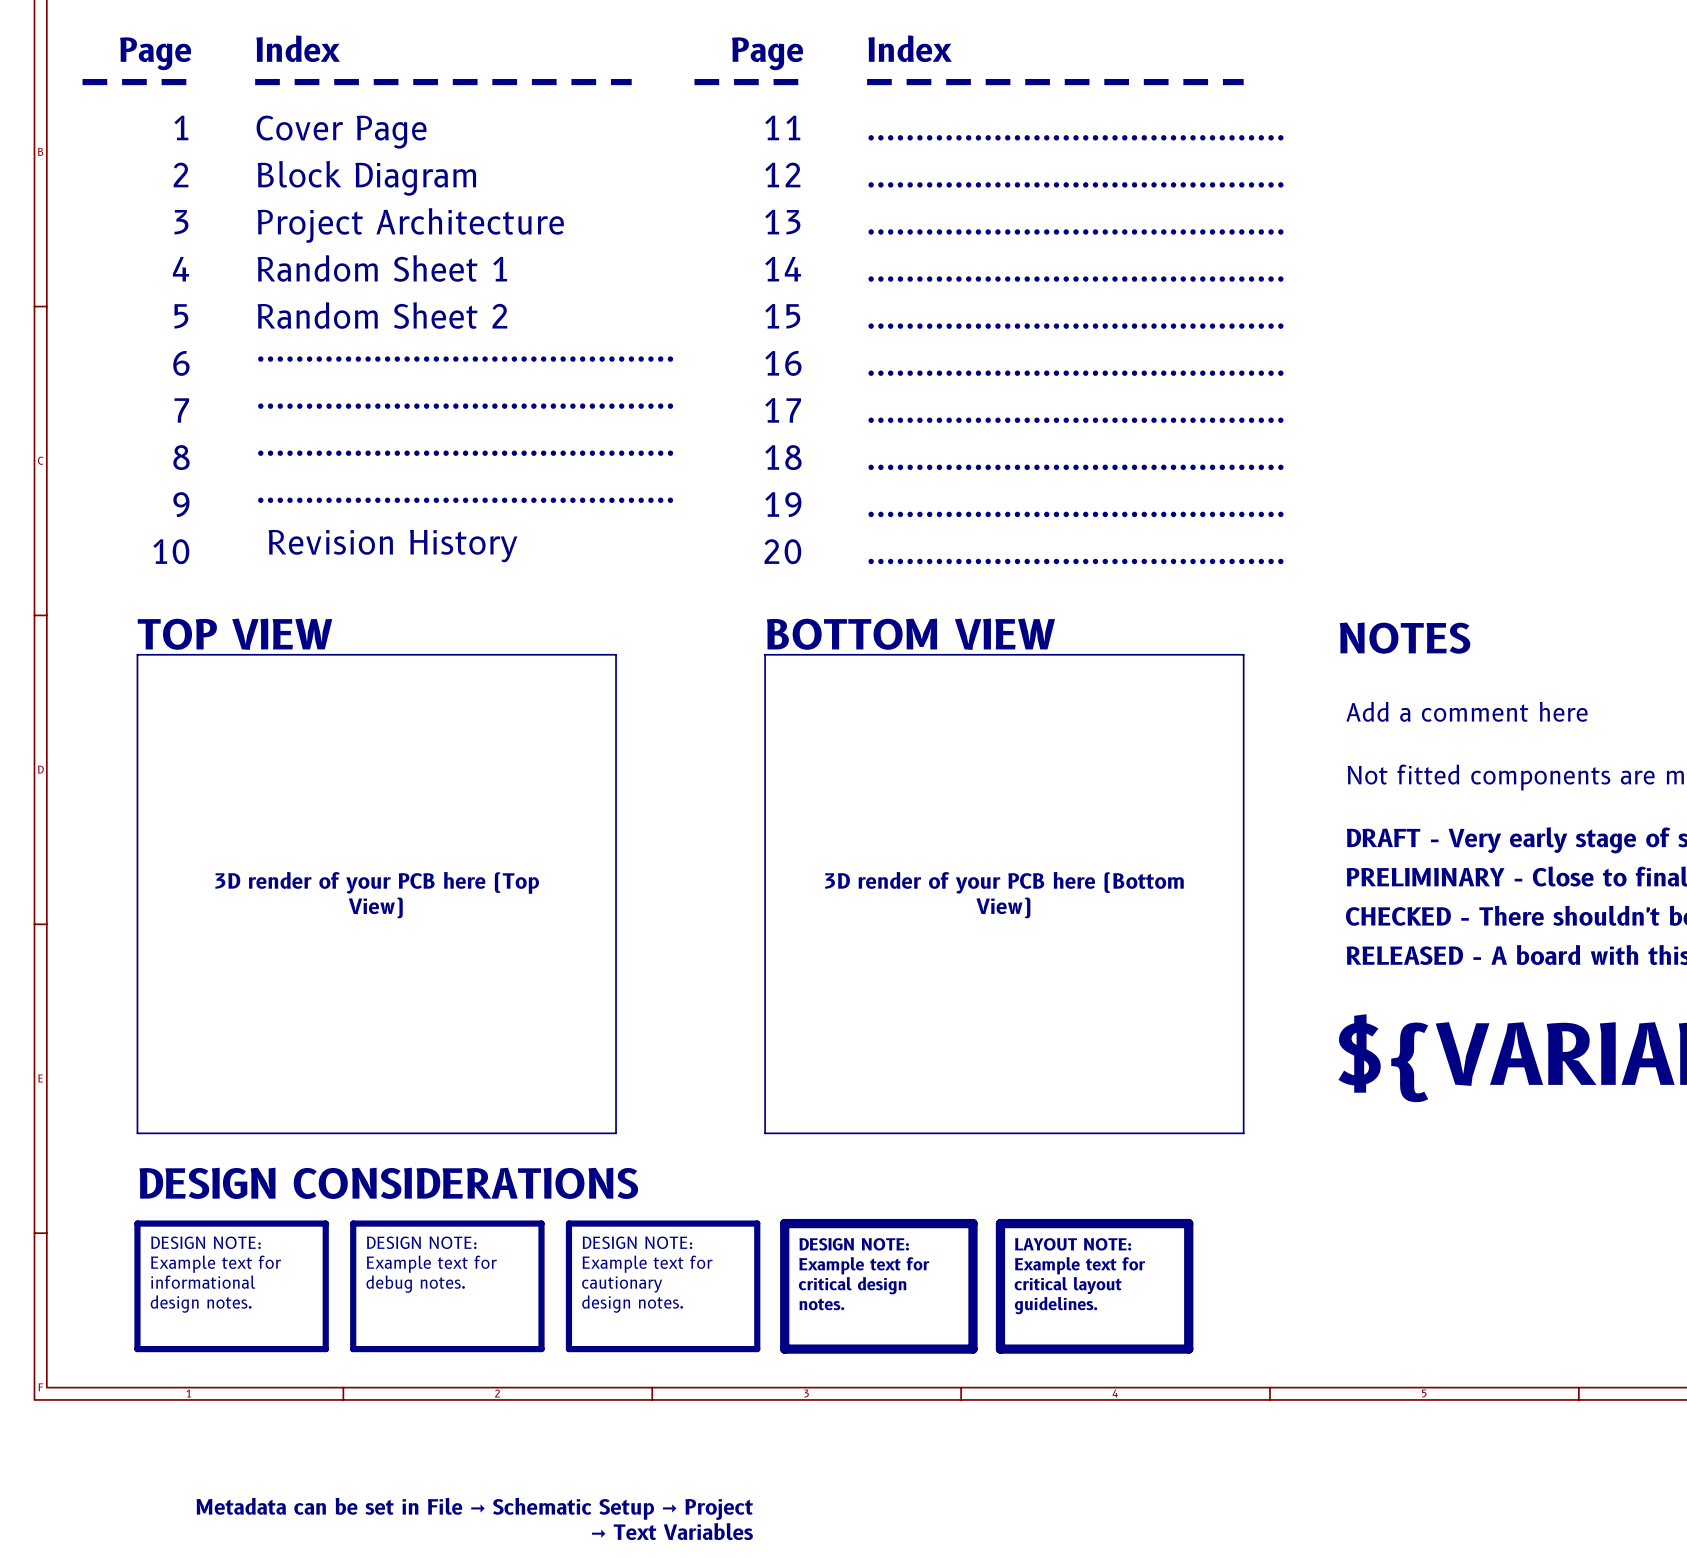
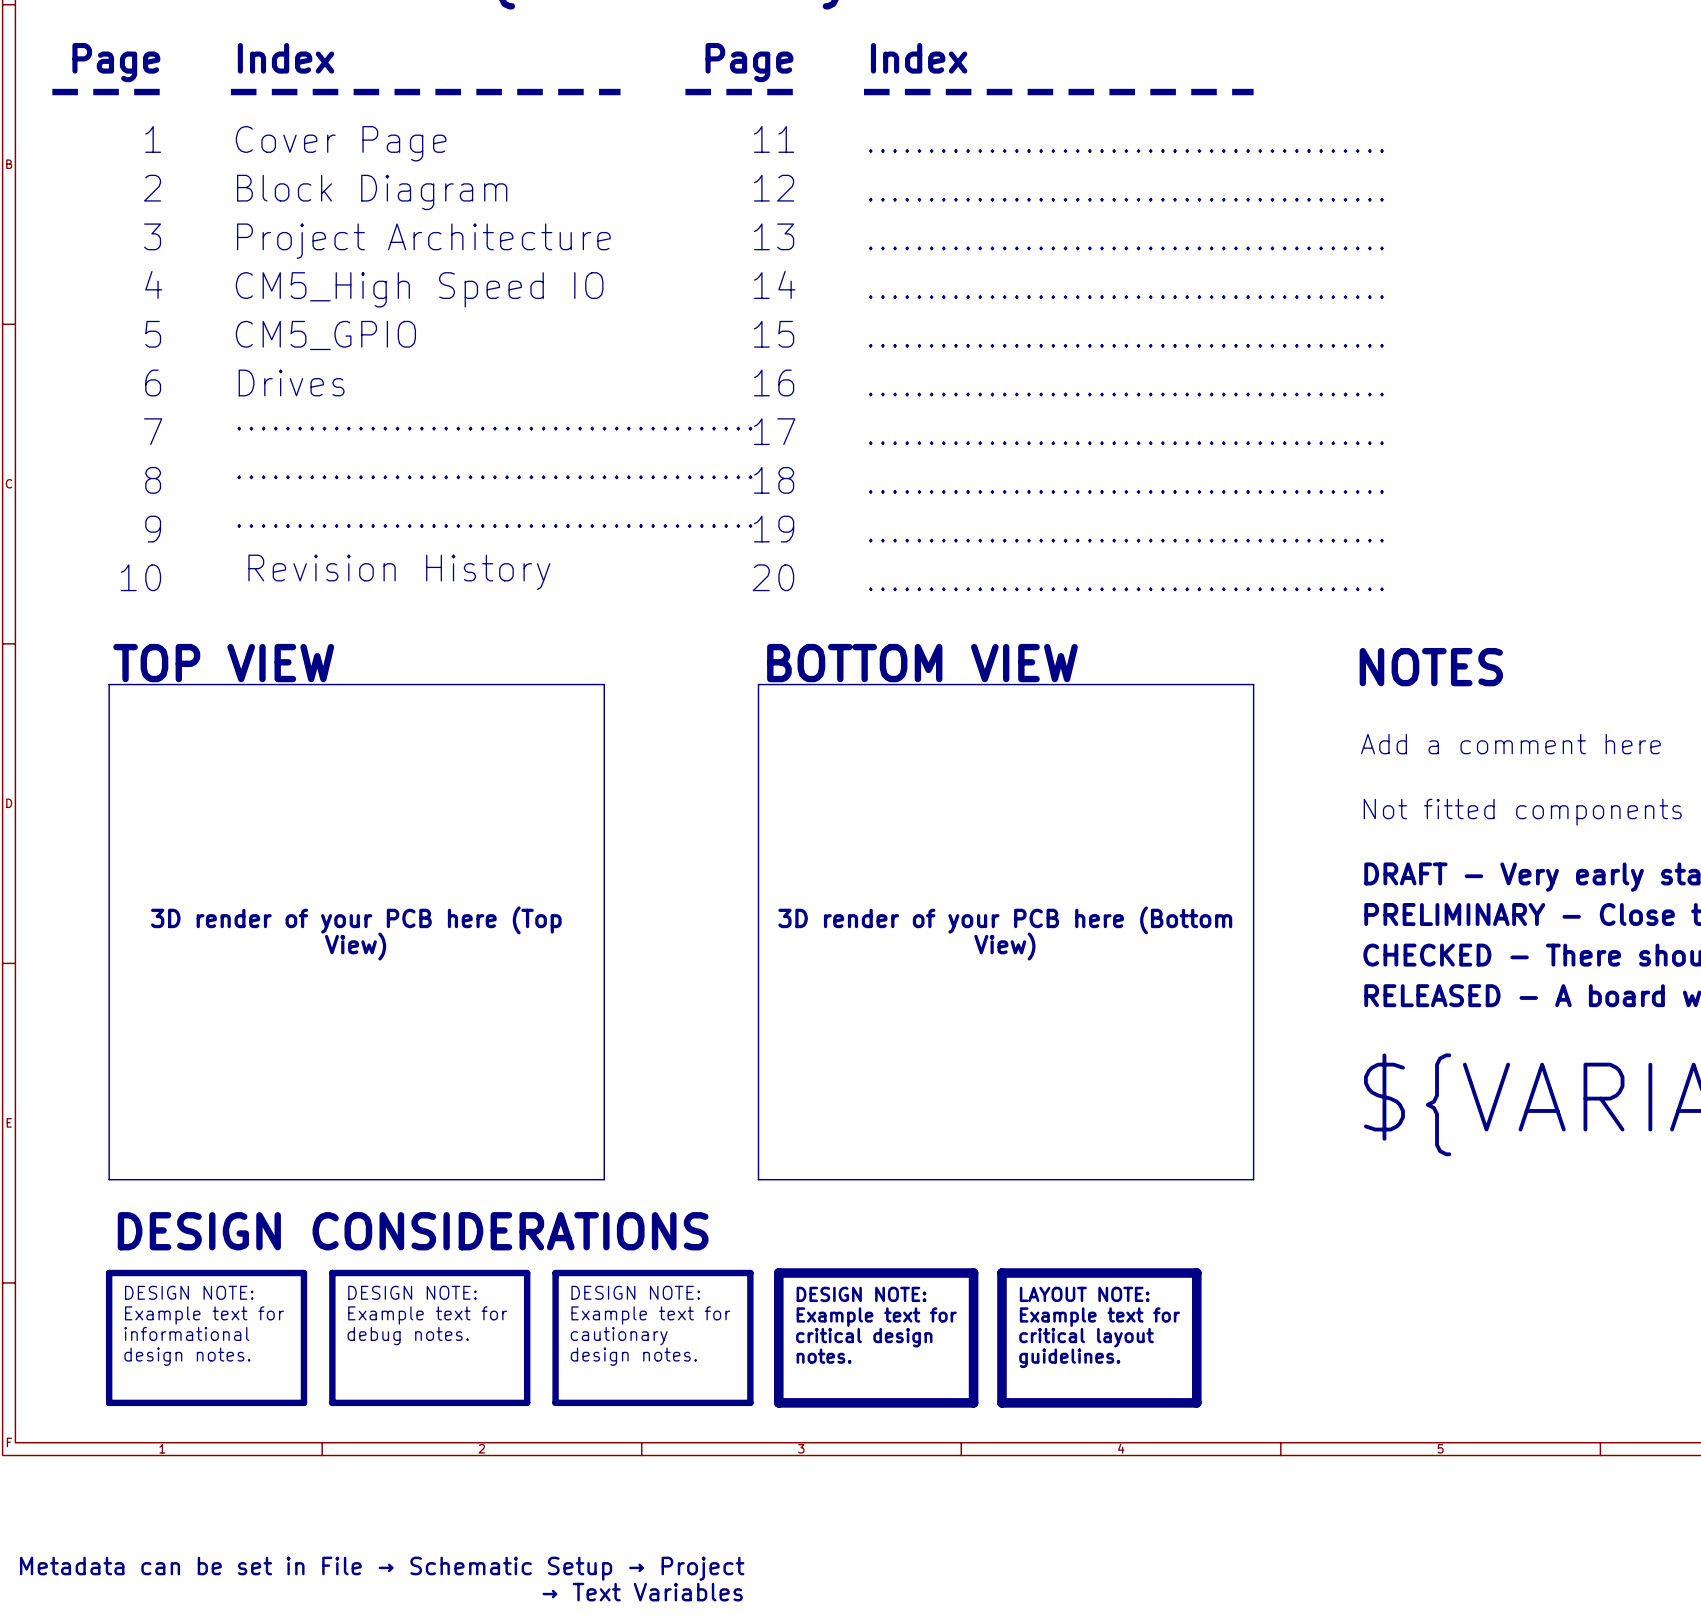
text: Random Sheet 1 (382, 268) -> CM5_High Speed IO (419, 289)
text: Random Sheet 2 (382, 315) -> CM5_GPIO (325, 335)
text: ........................................... (465, 359) -> none
text: none -> Drives (291, 382)

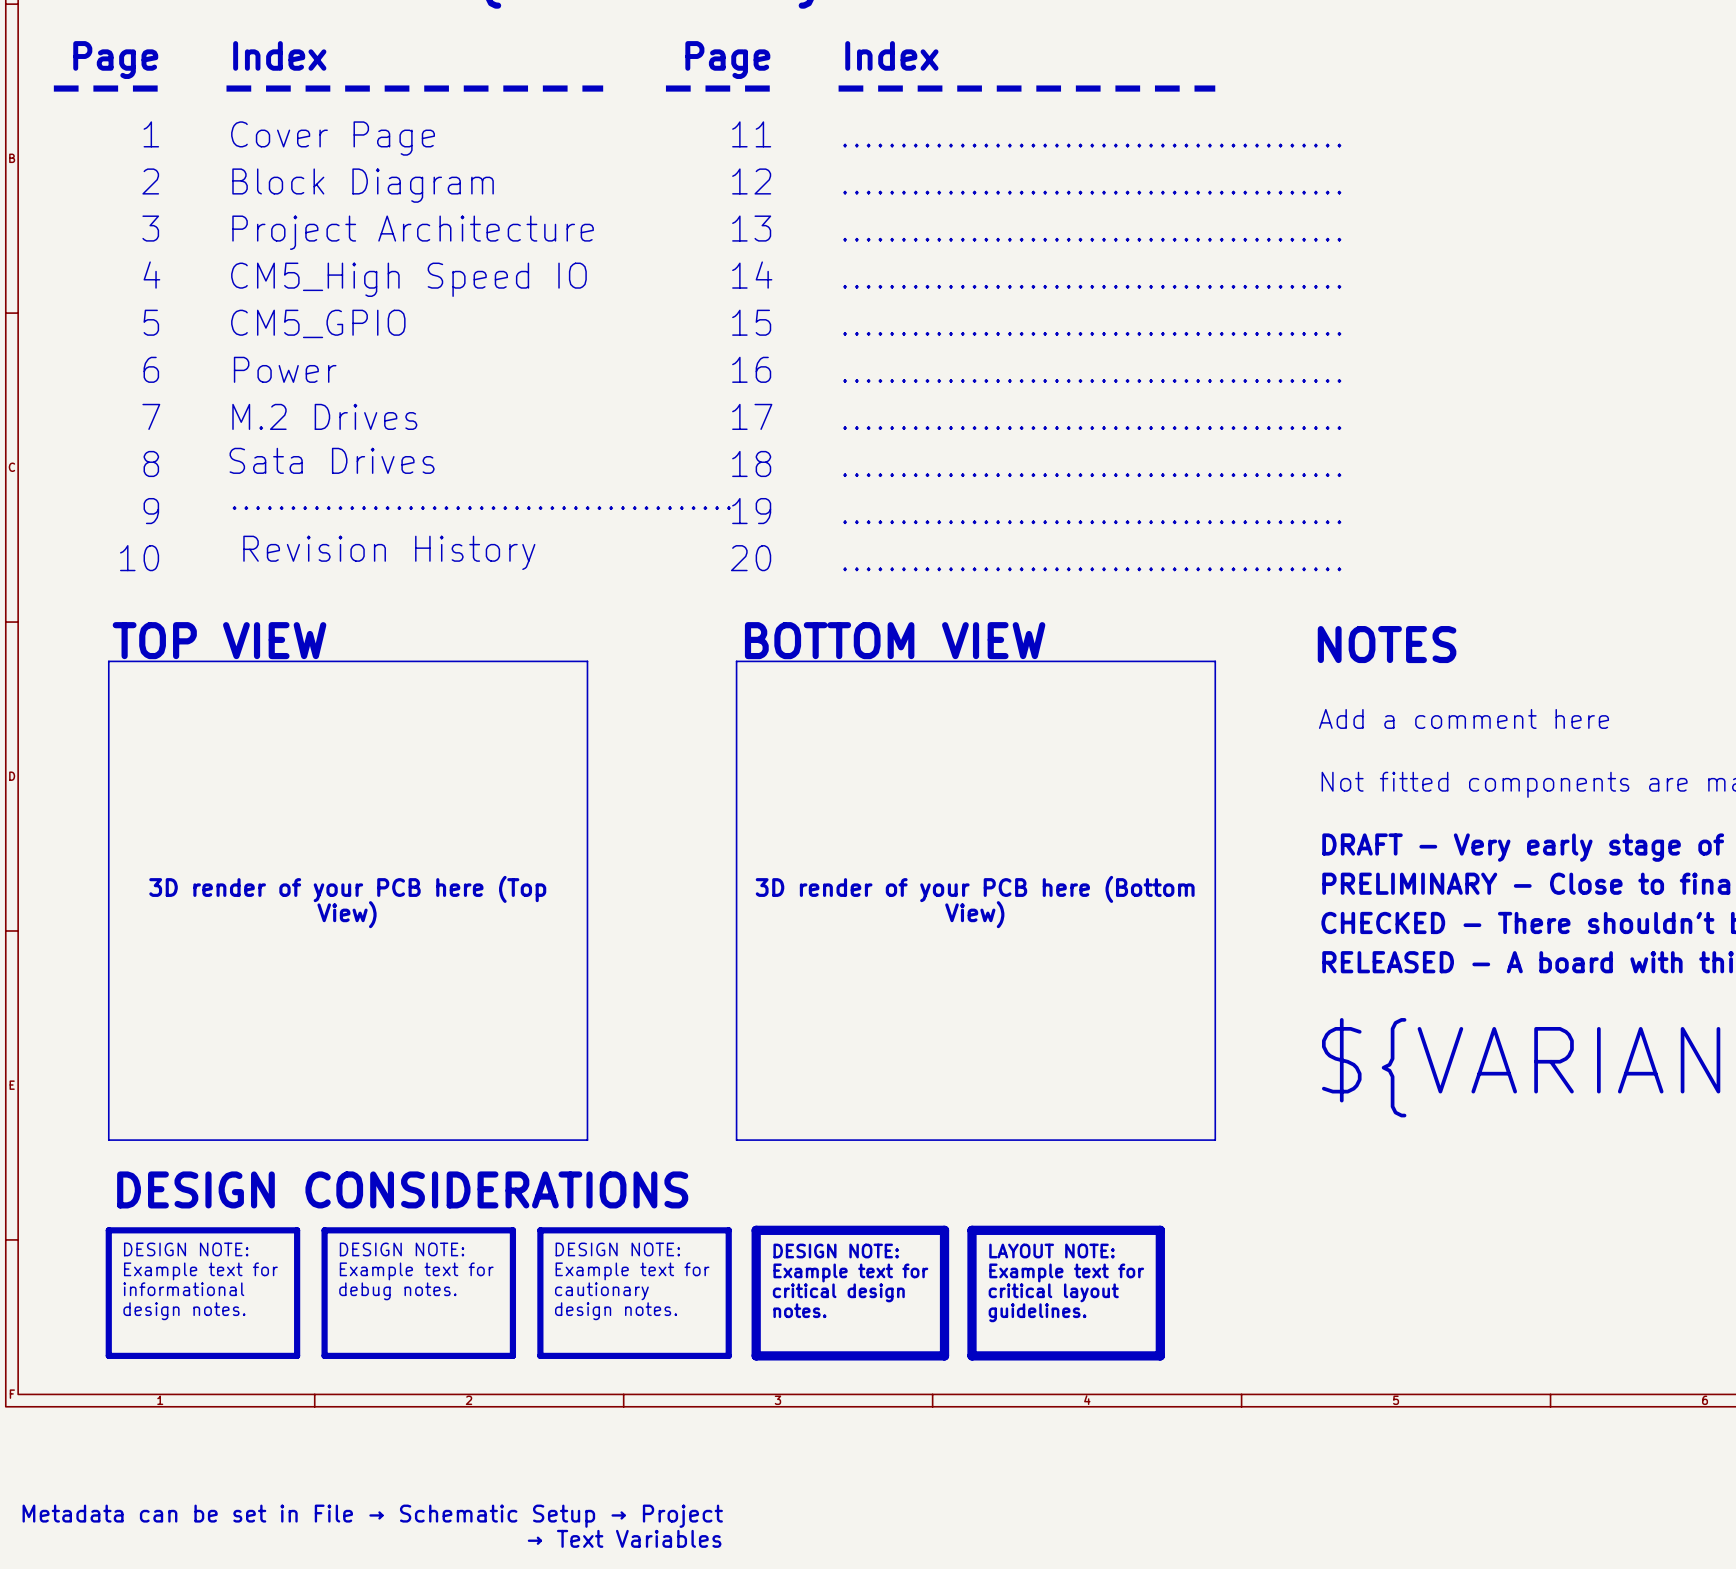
text: Drives (291, 382) -> Power (285, 369)
text: ........................................... (494, 428) -> none
text: none -> M.2 Drives (324, 416)
text: none -> Sata Drives (332, 460)
text: ........................................... (494, 477) -> none

